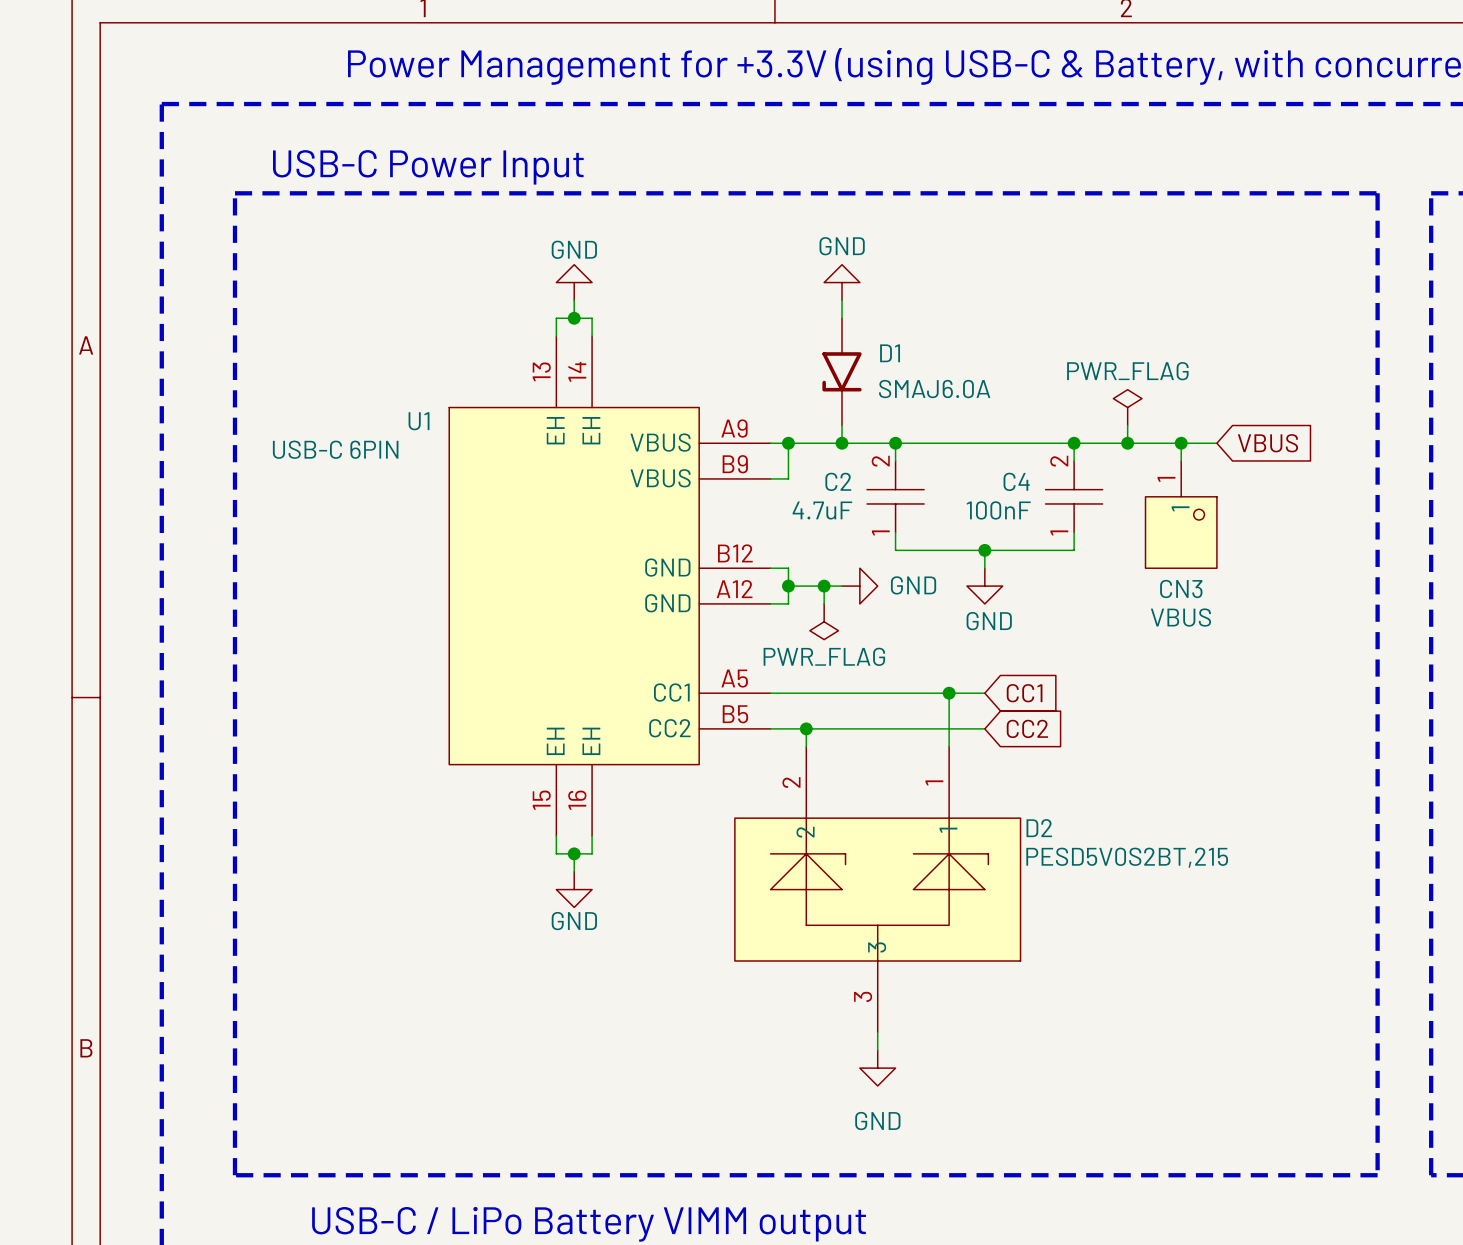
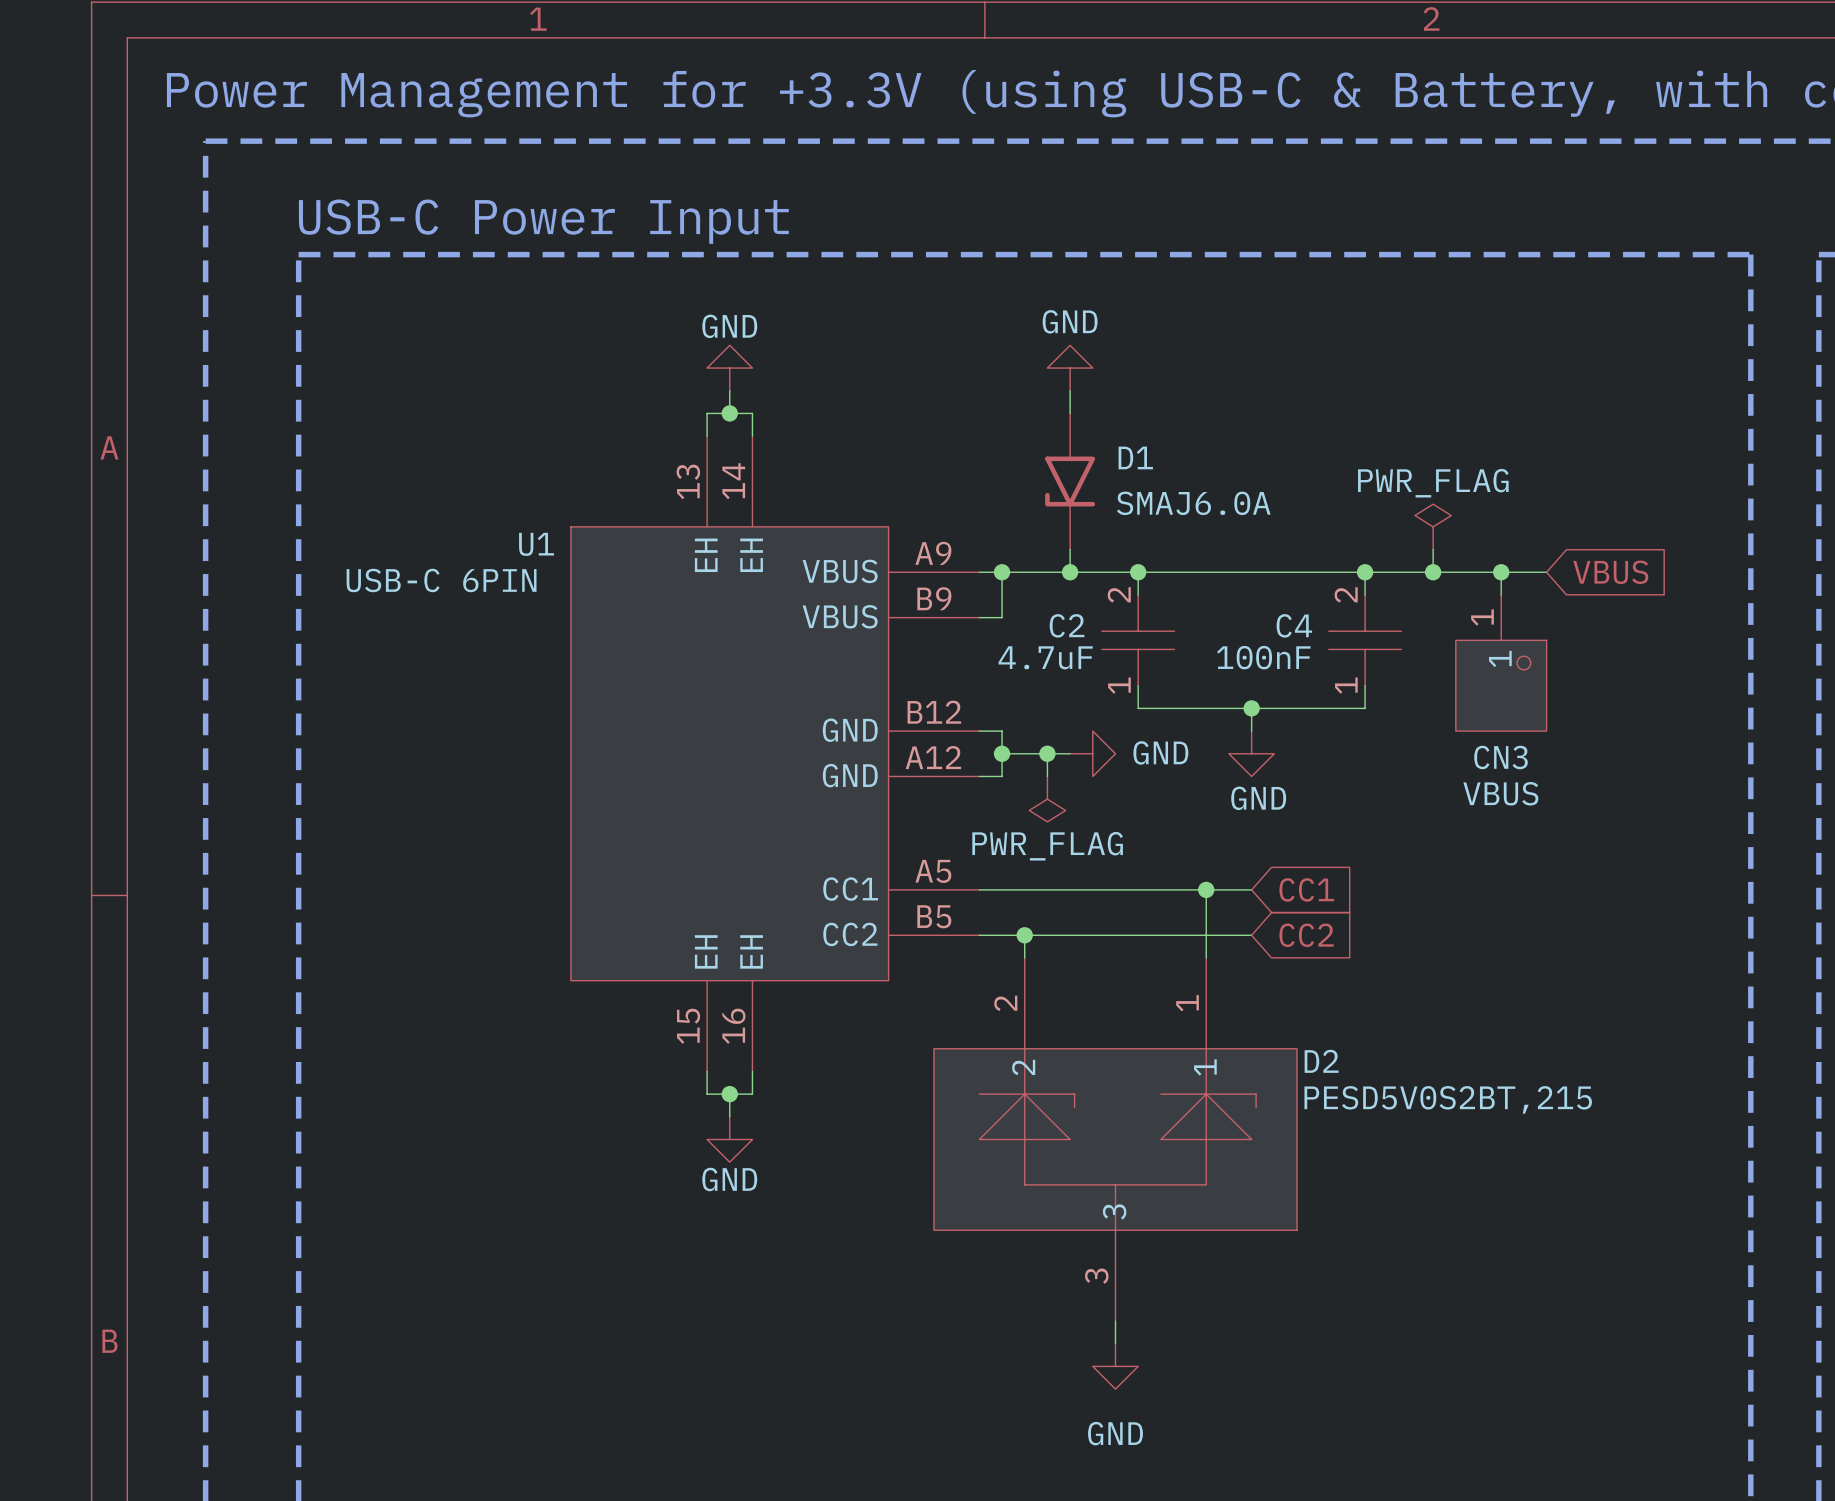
C2 name position: C2 (838, 481) -> C2 (1067, 625)
C4 name position: C4 (1016, 481) -> C4 (1294, 625)
C2 value position: 4.7uF (822, 510) -> 4.7uF (1045, 657)
C4 value position: 100nF (998, 510) -> 100nF (1263, 657)

